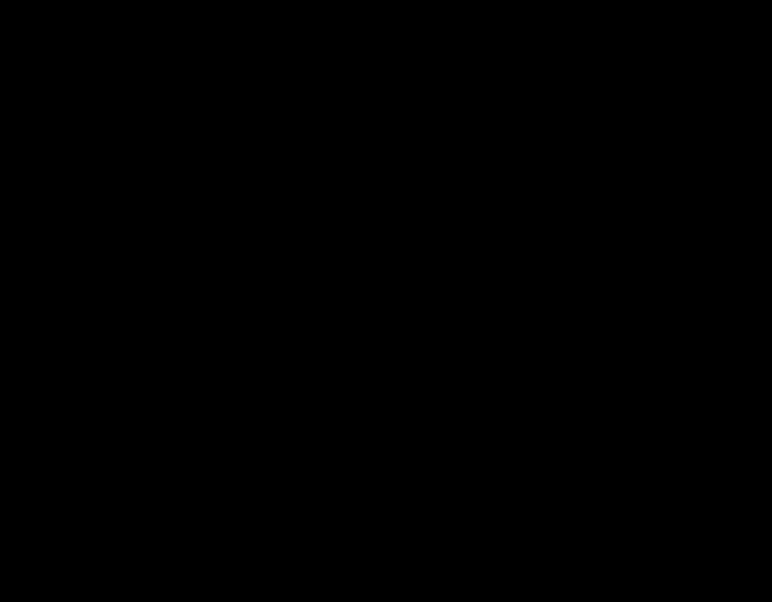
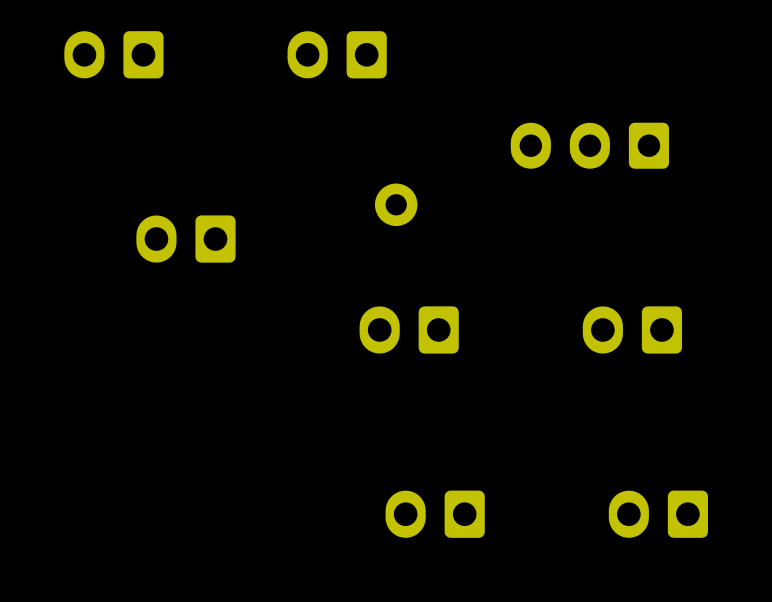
part: none -> (113, 54)
part: none -> (337, 54)
part: none -> (589, 145)
part: none -> (396, 204)
part: none -> (185, 239)
part: none -> (409, 329)
part: none -> (632, 329)
part: none -> (435, 514)
part: none -> (658, 514)

